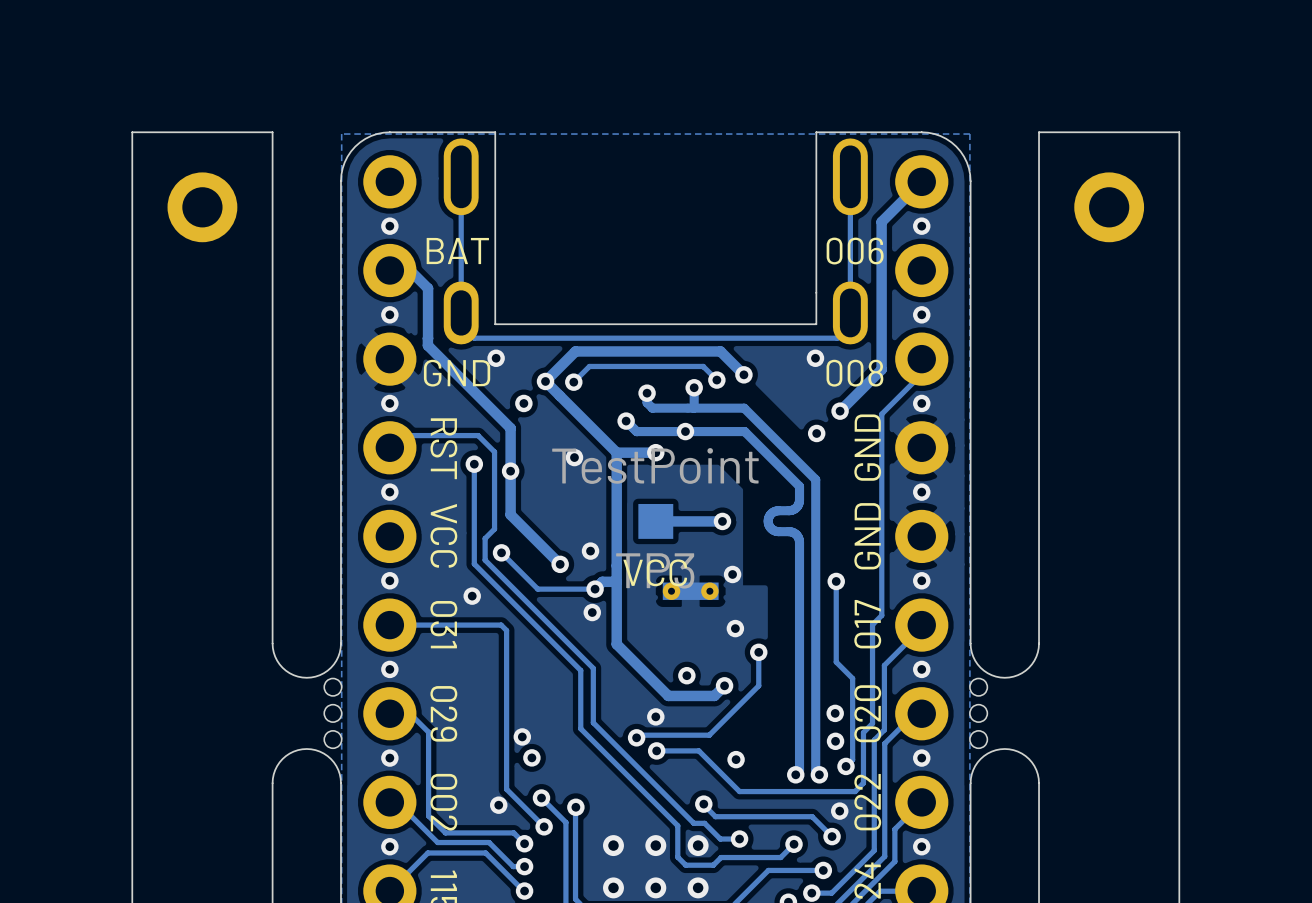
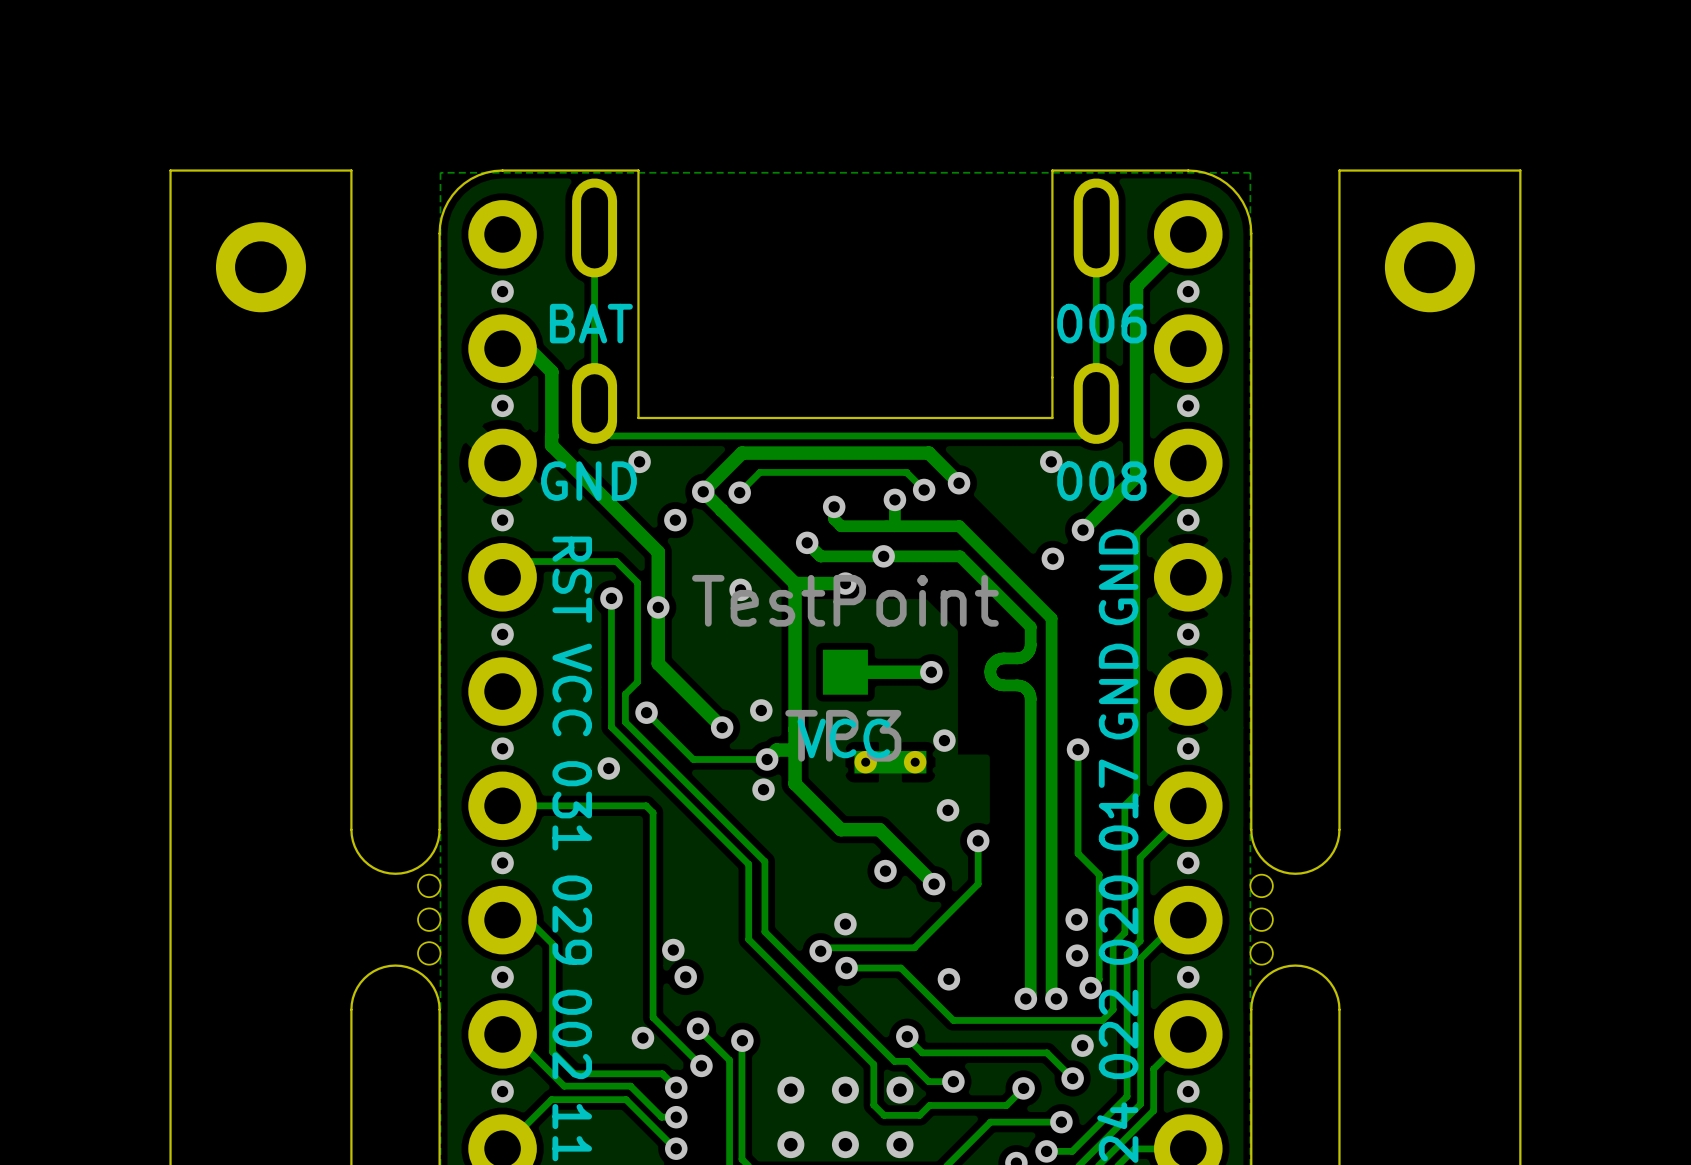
track: (616, 607) (616, 644) (668, 695) (714, 695) (724, 685) -> (795, 783) (840, 829) (879, 829) (934, 884)

